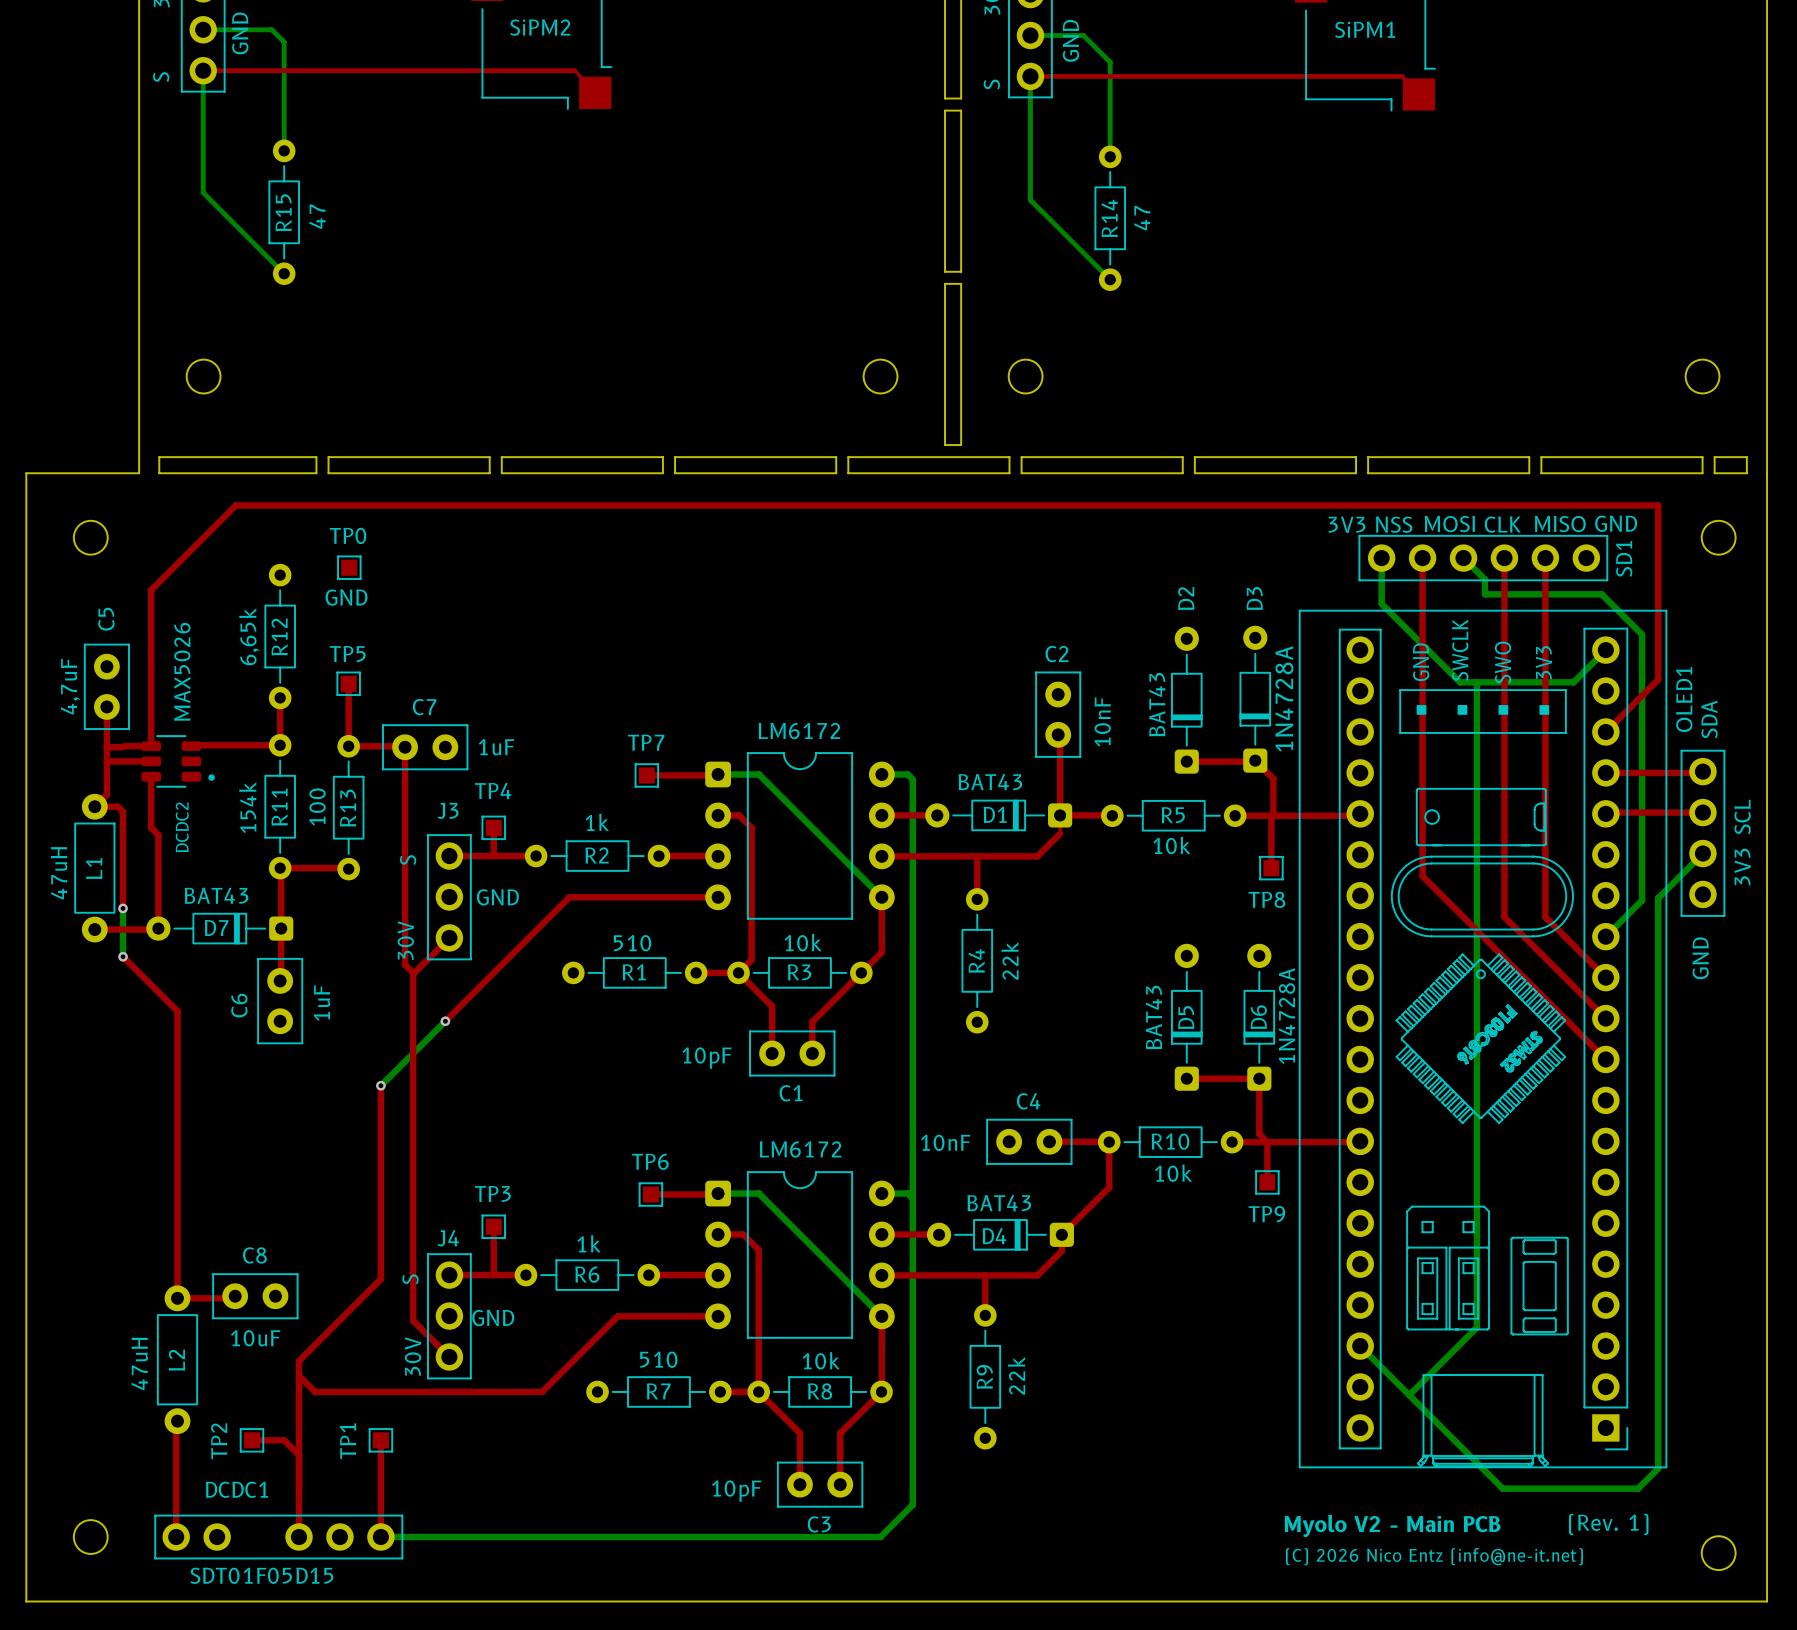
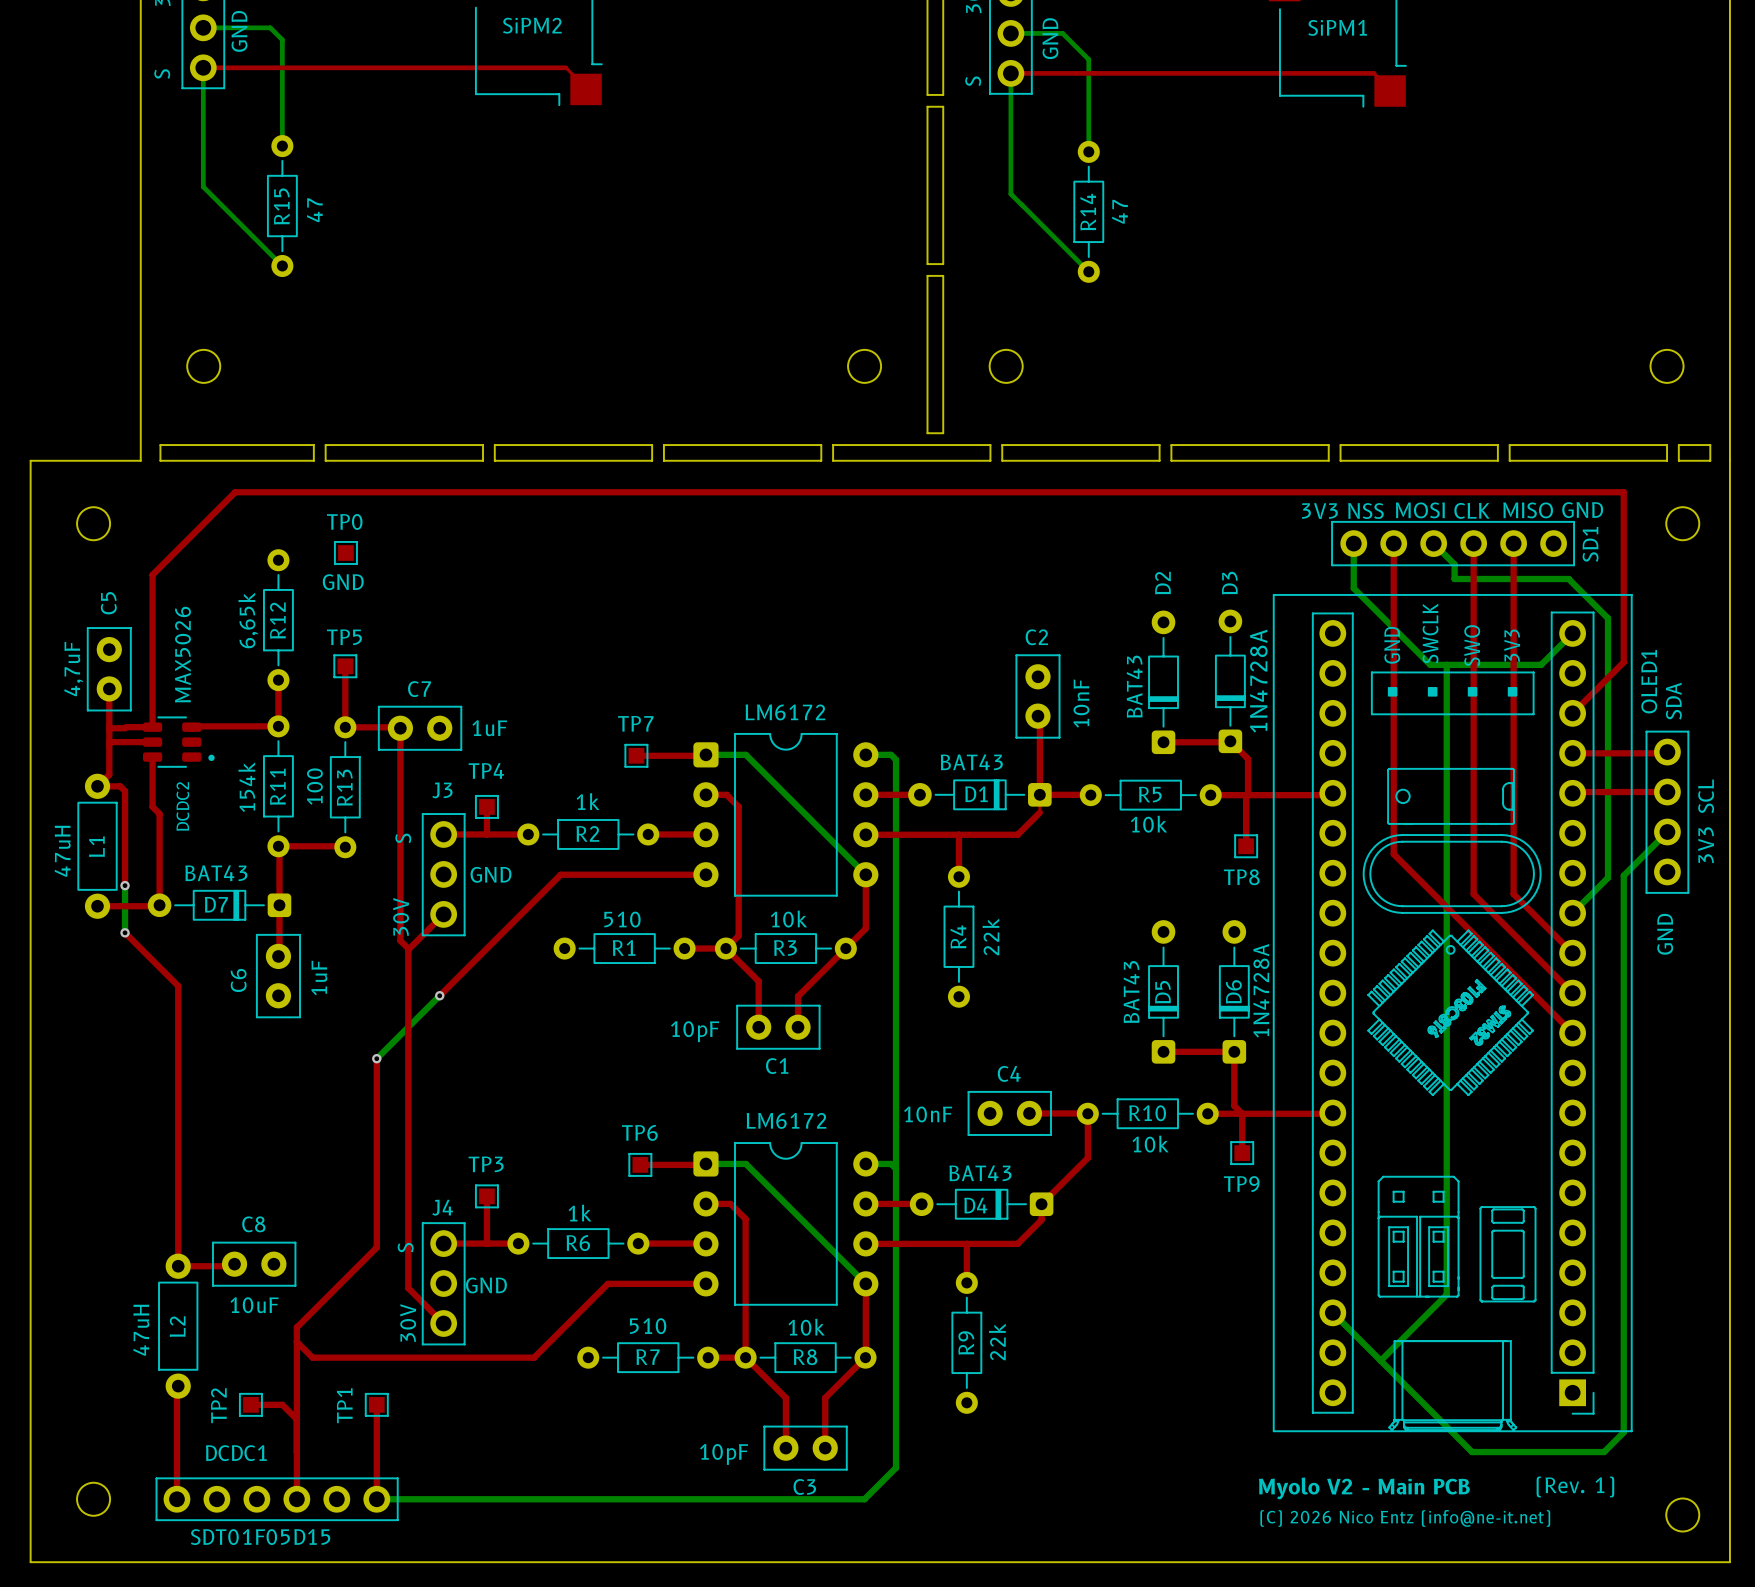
DCDC1 footprint: [154, 1514, 404, 1560] -> [155, 1477, 399, 1522]

